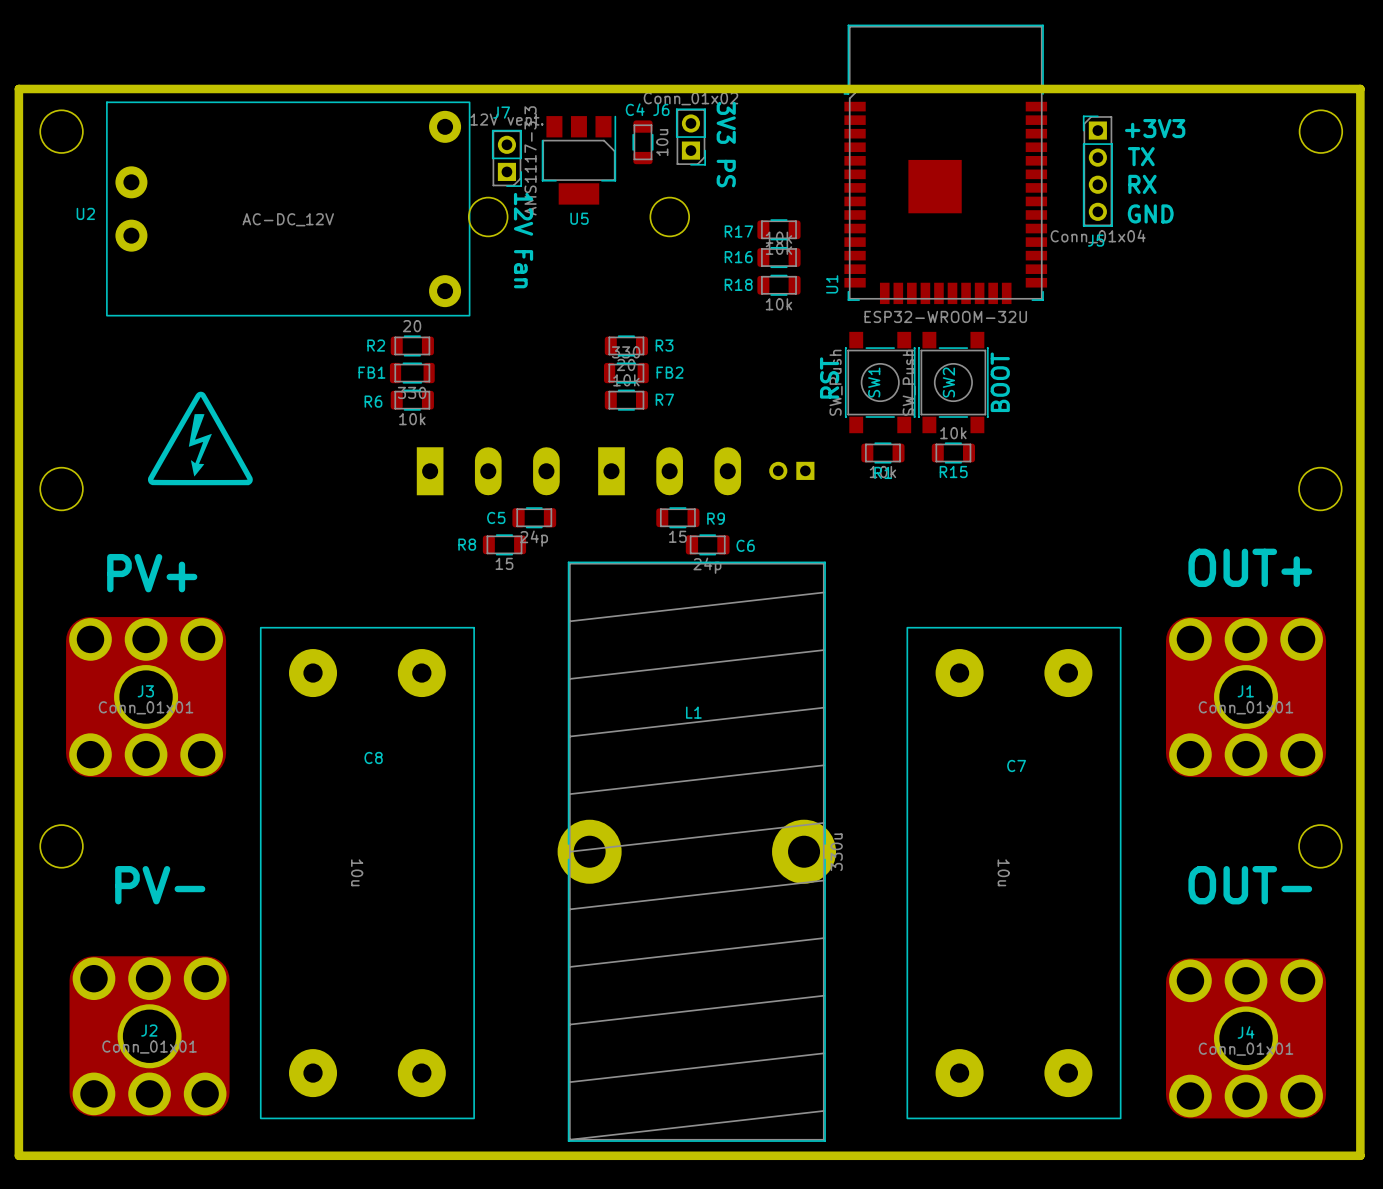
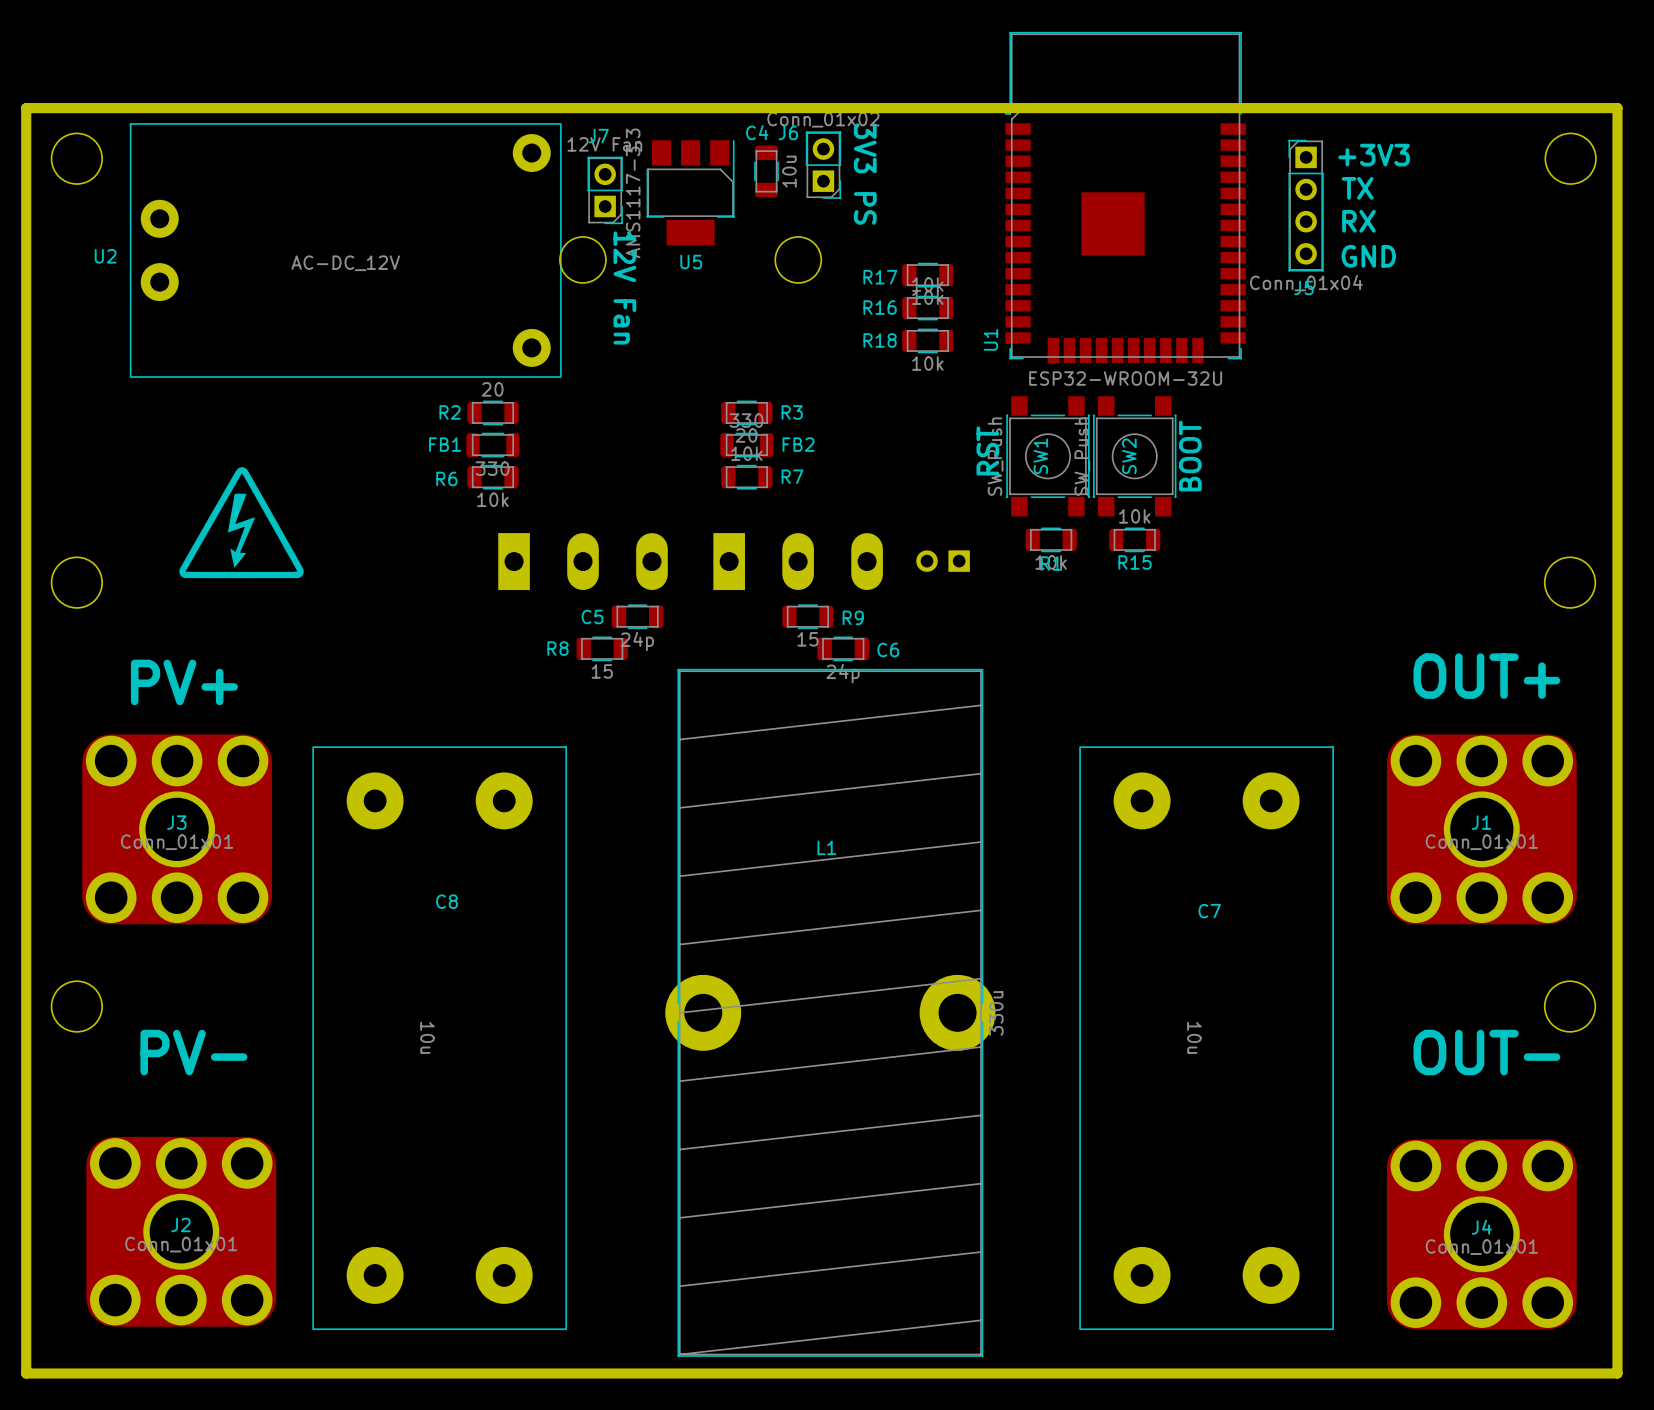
J7 value: 12V vent. (506, 119) -> 12V Fan (604, 144)

